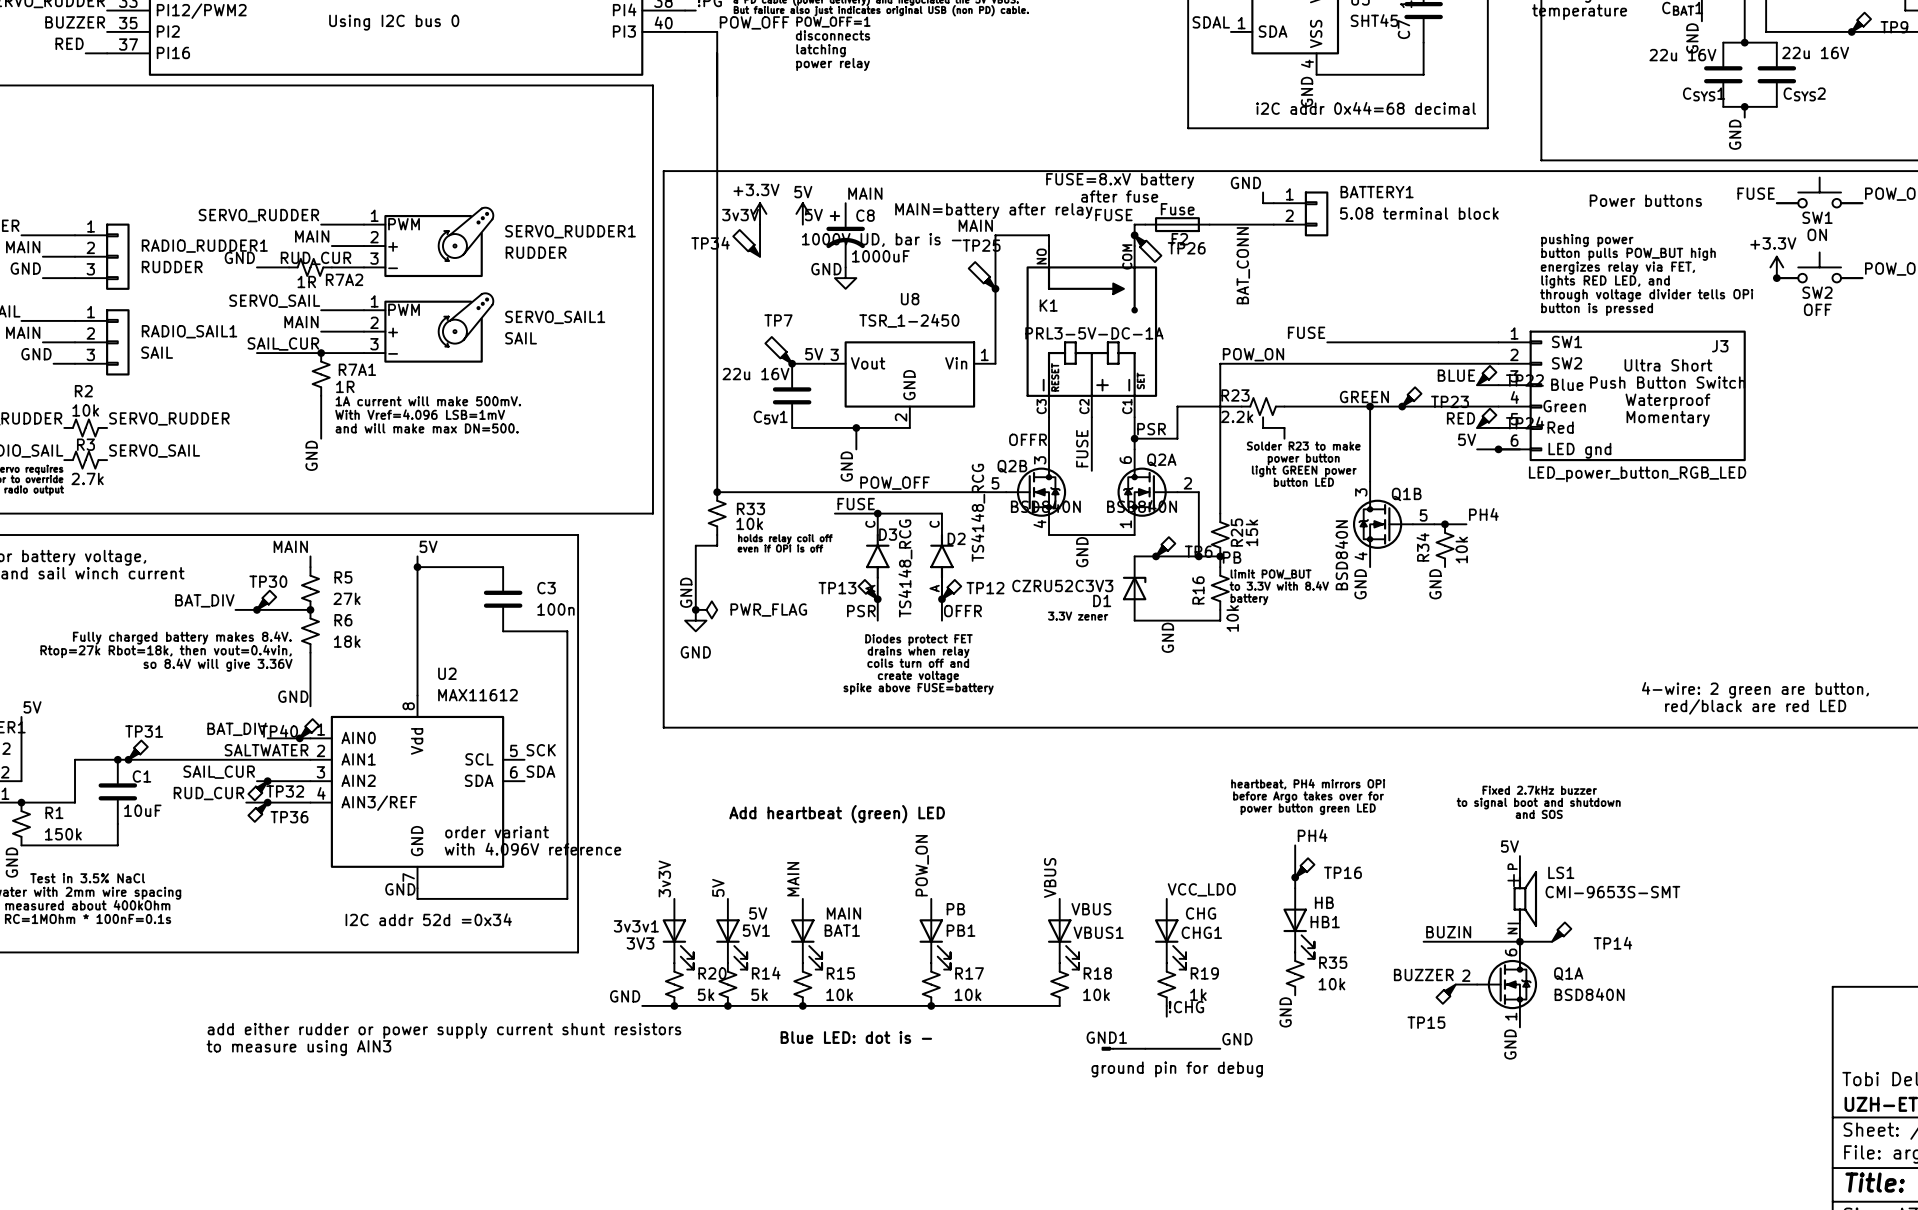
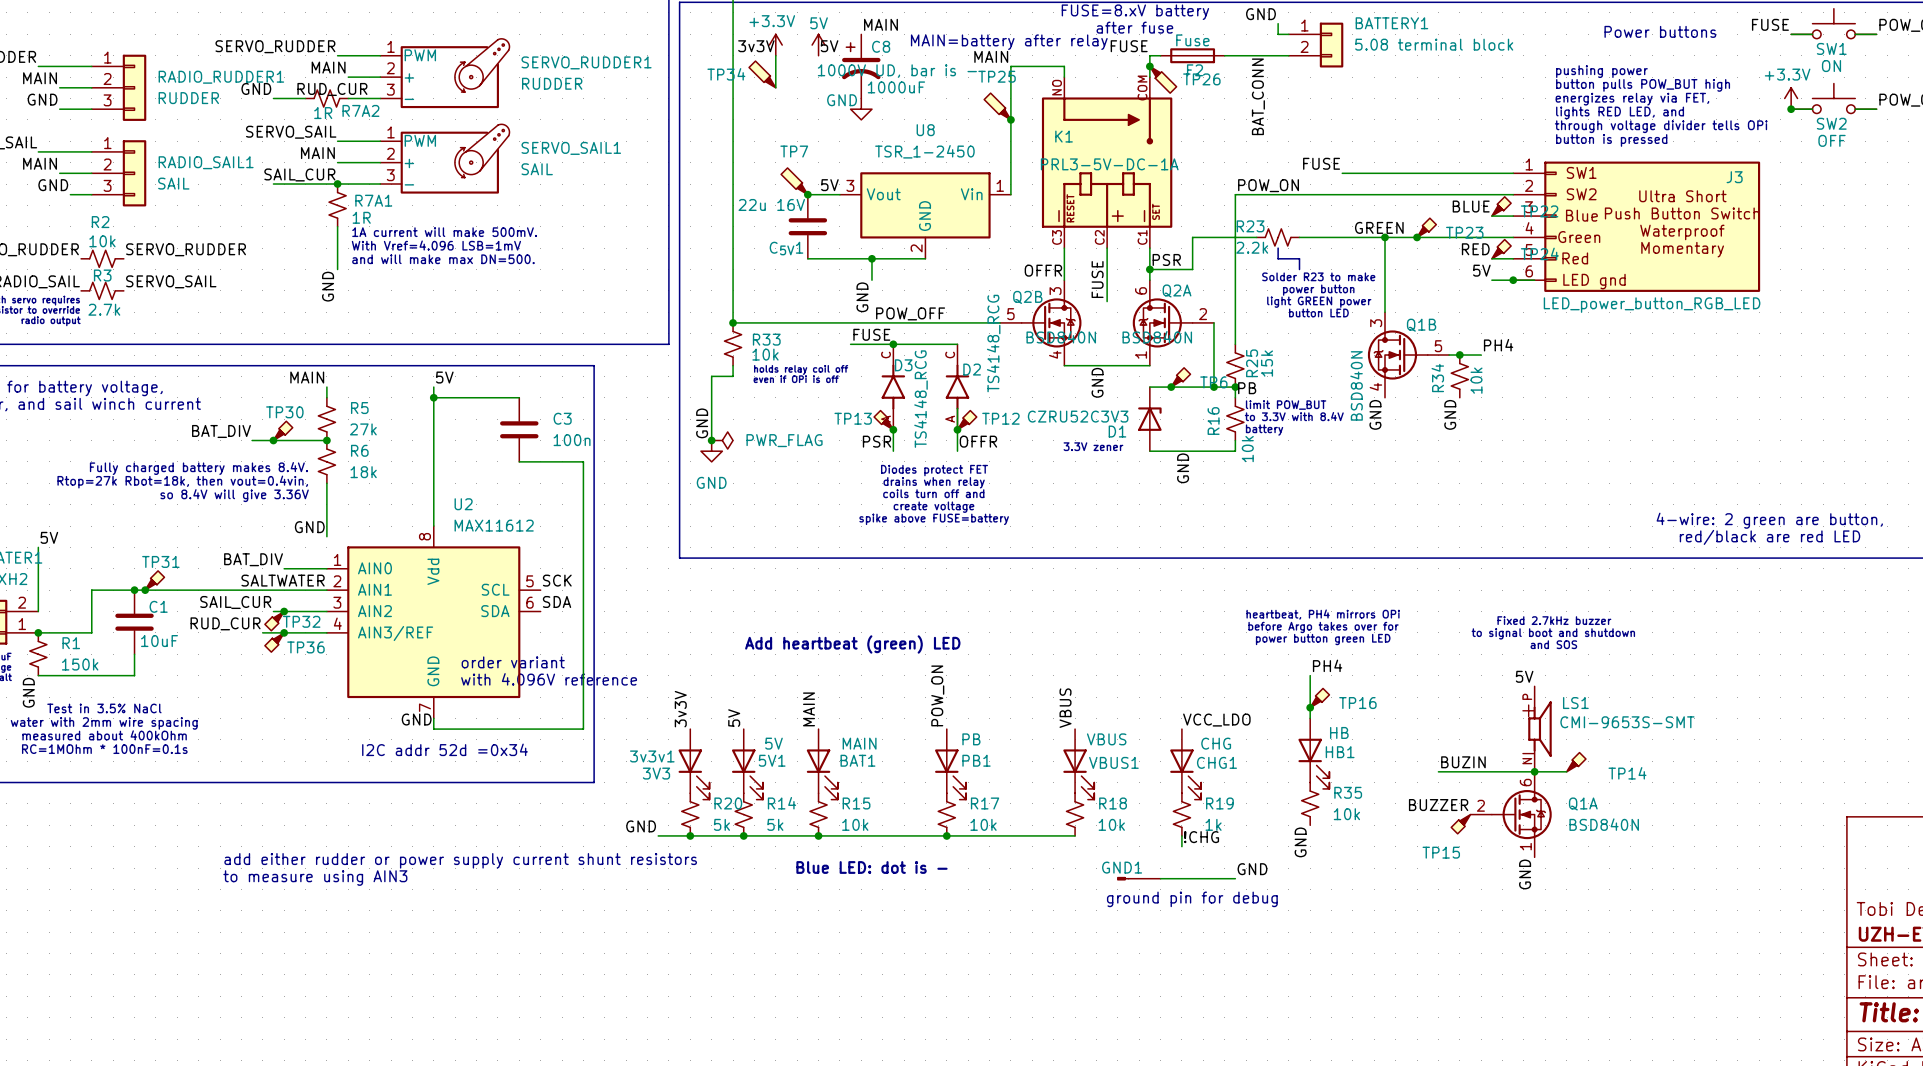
TP40: (309, 728) -> none
junction: (299, 738) -> none

